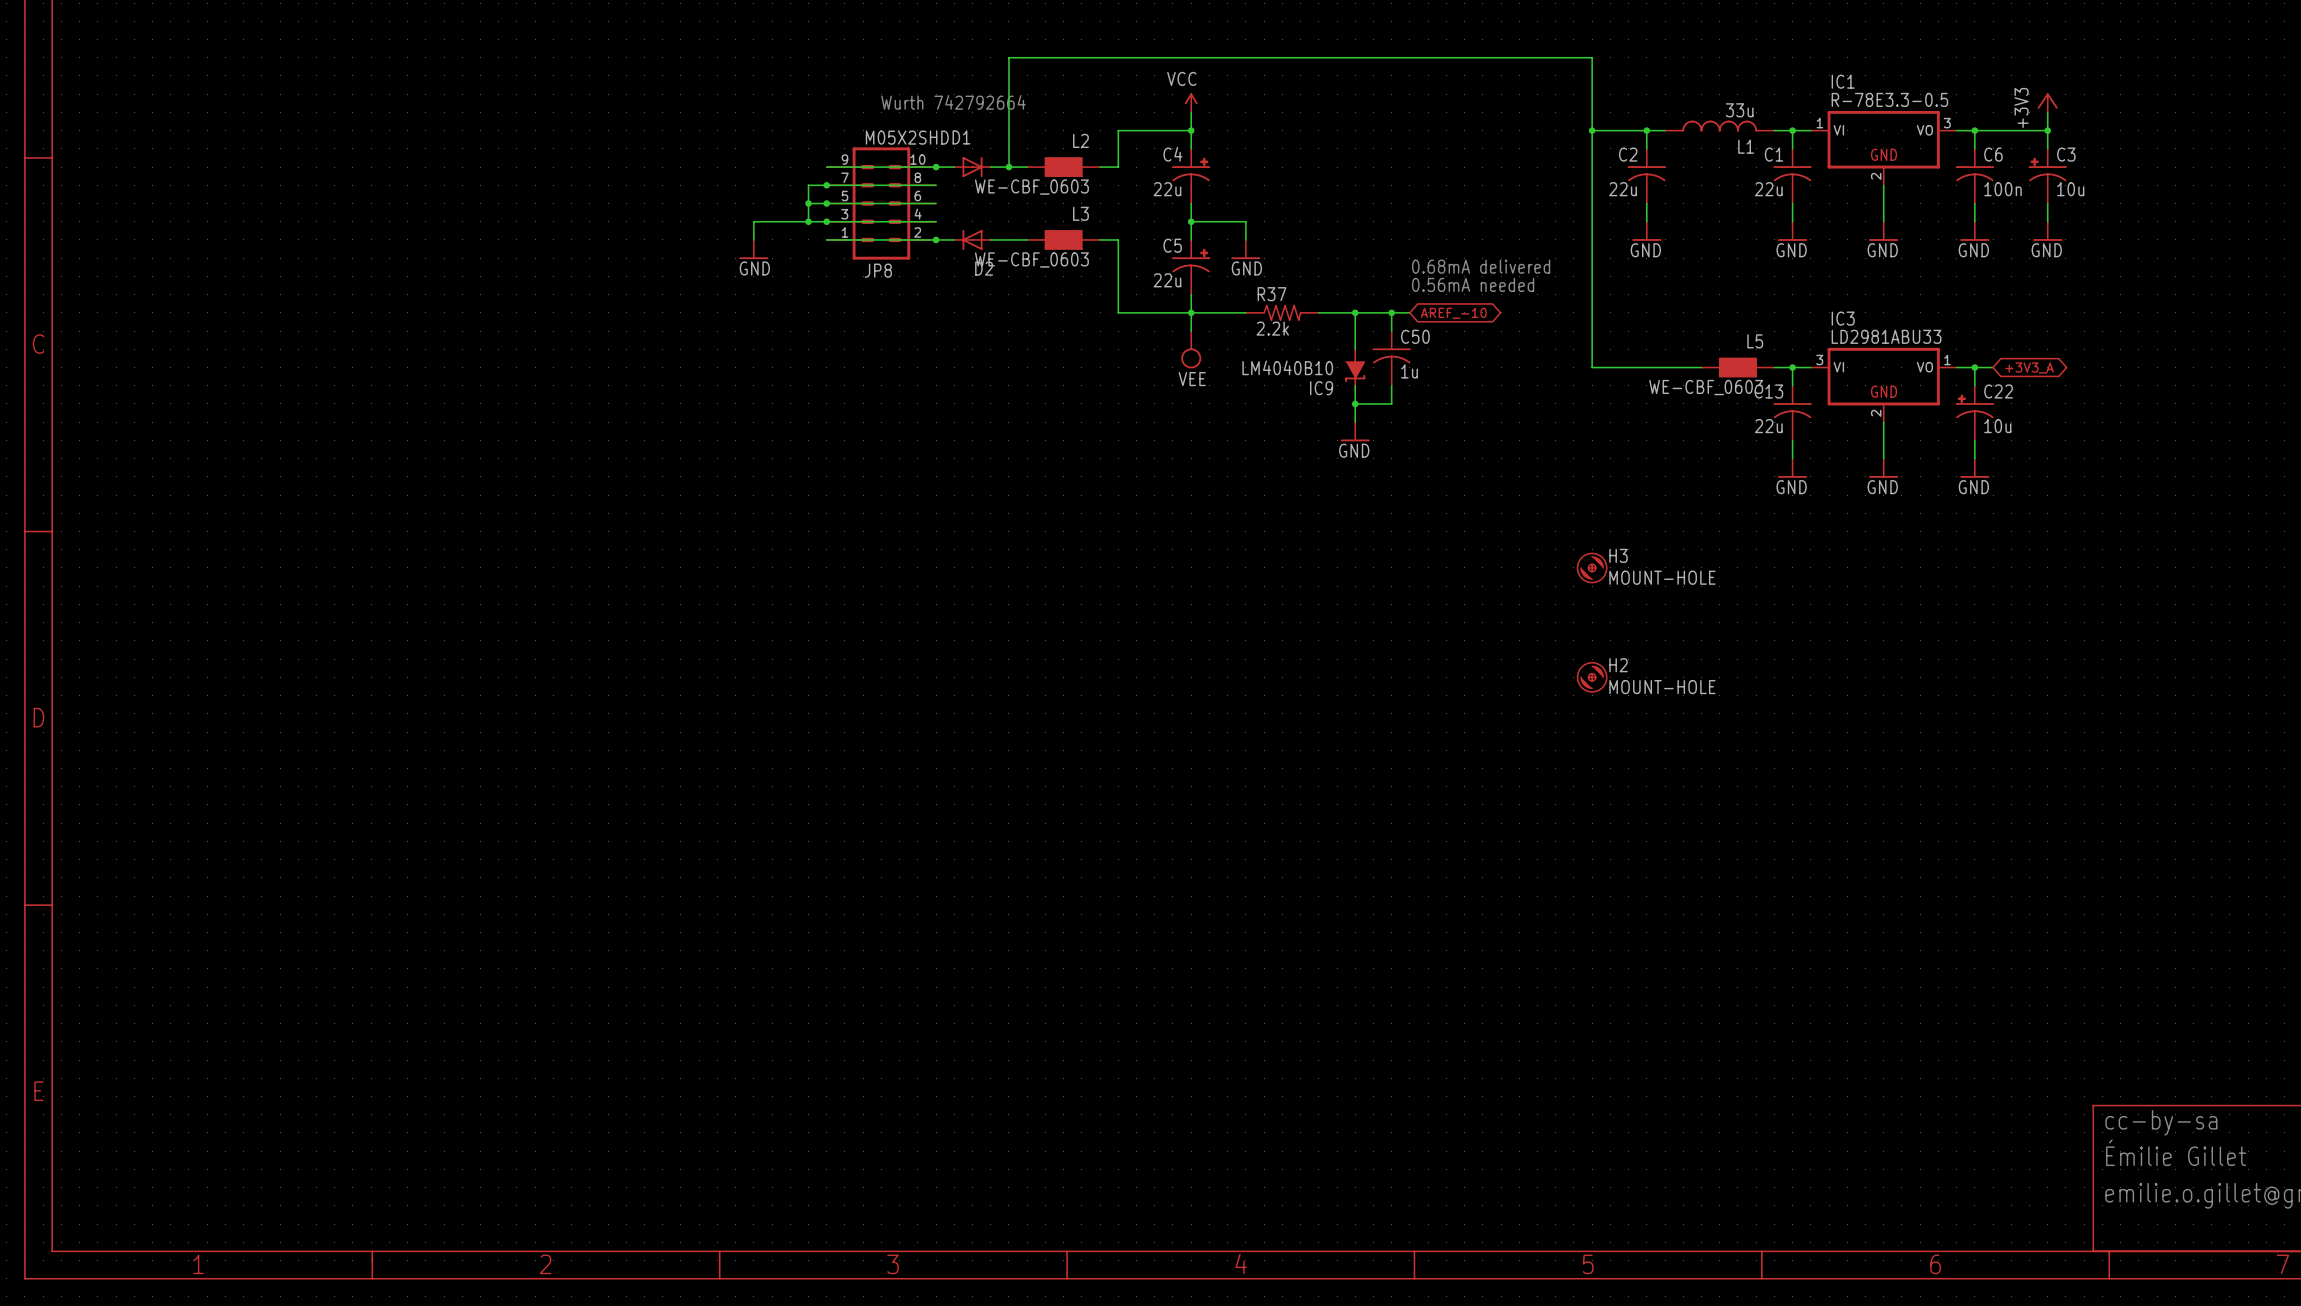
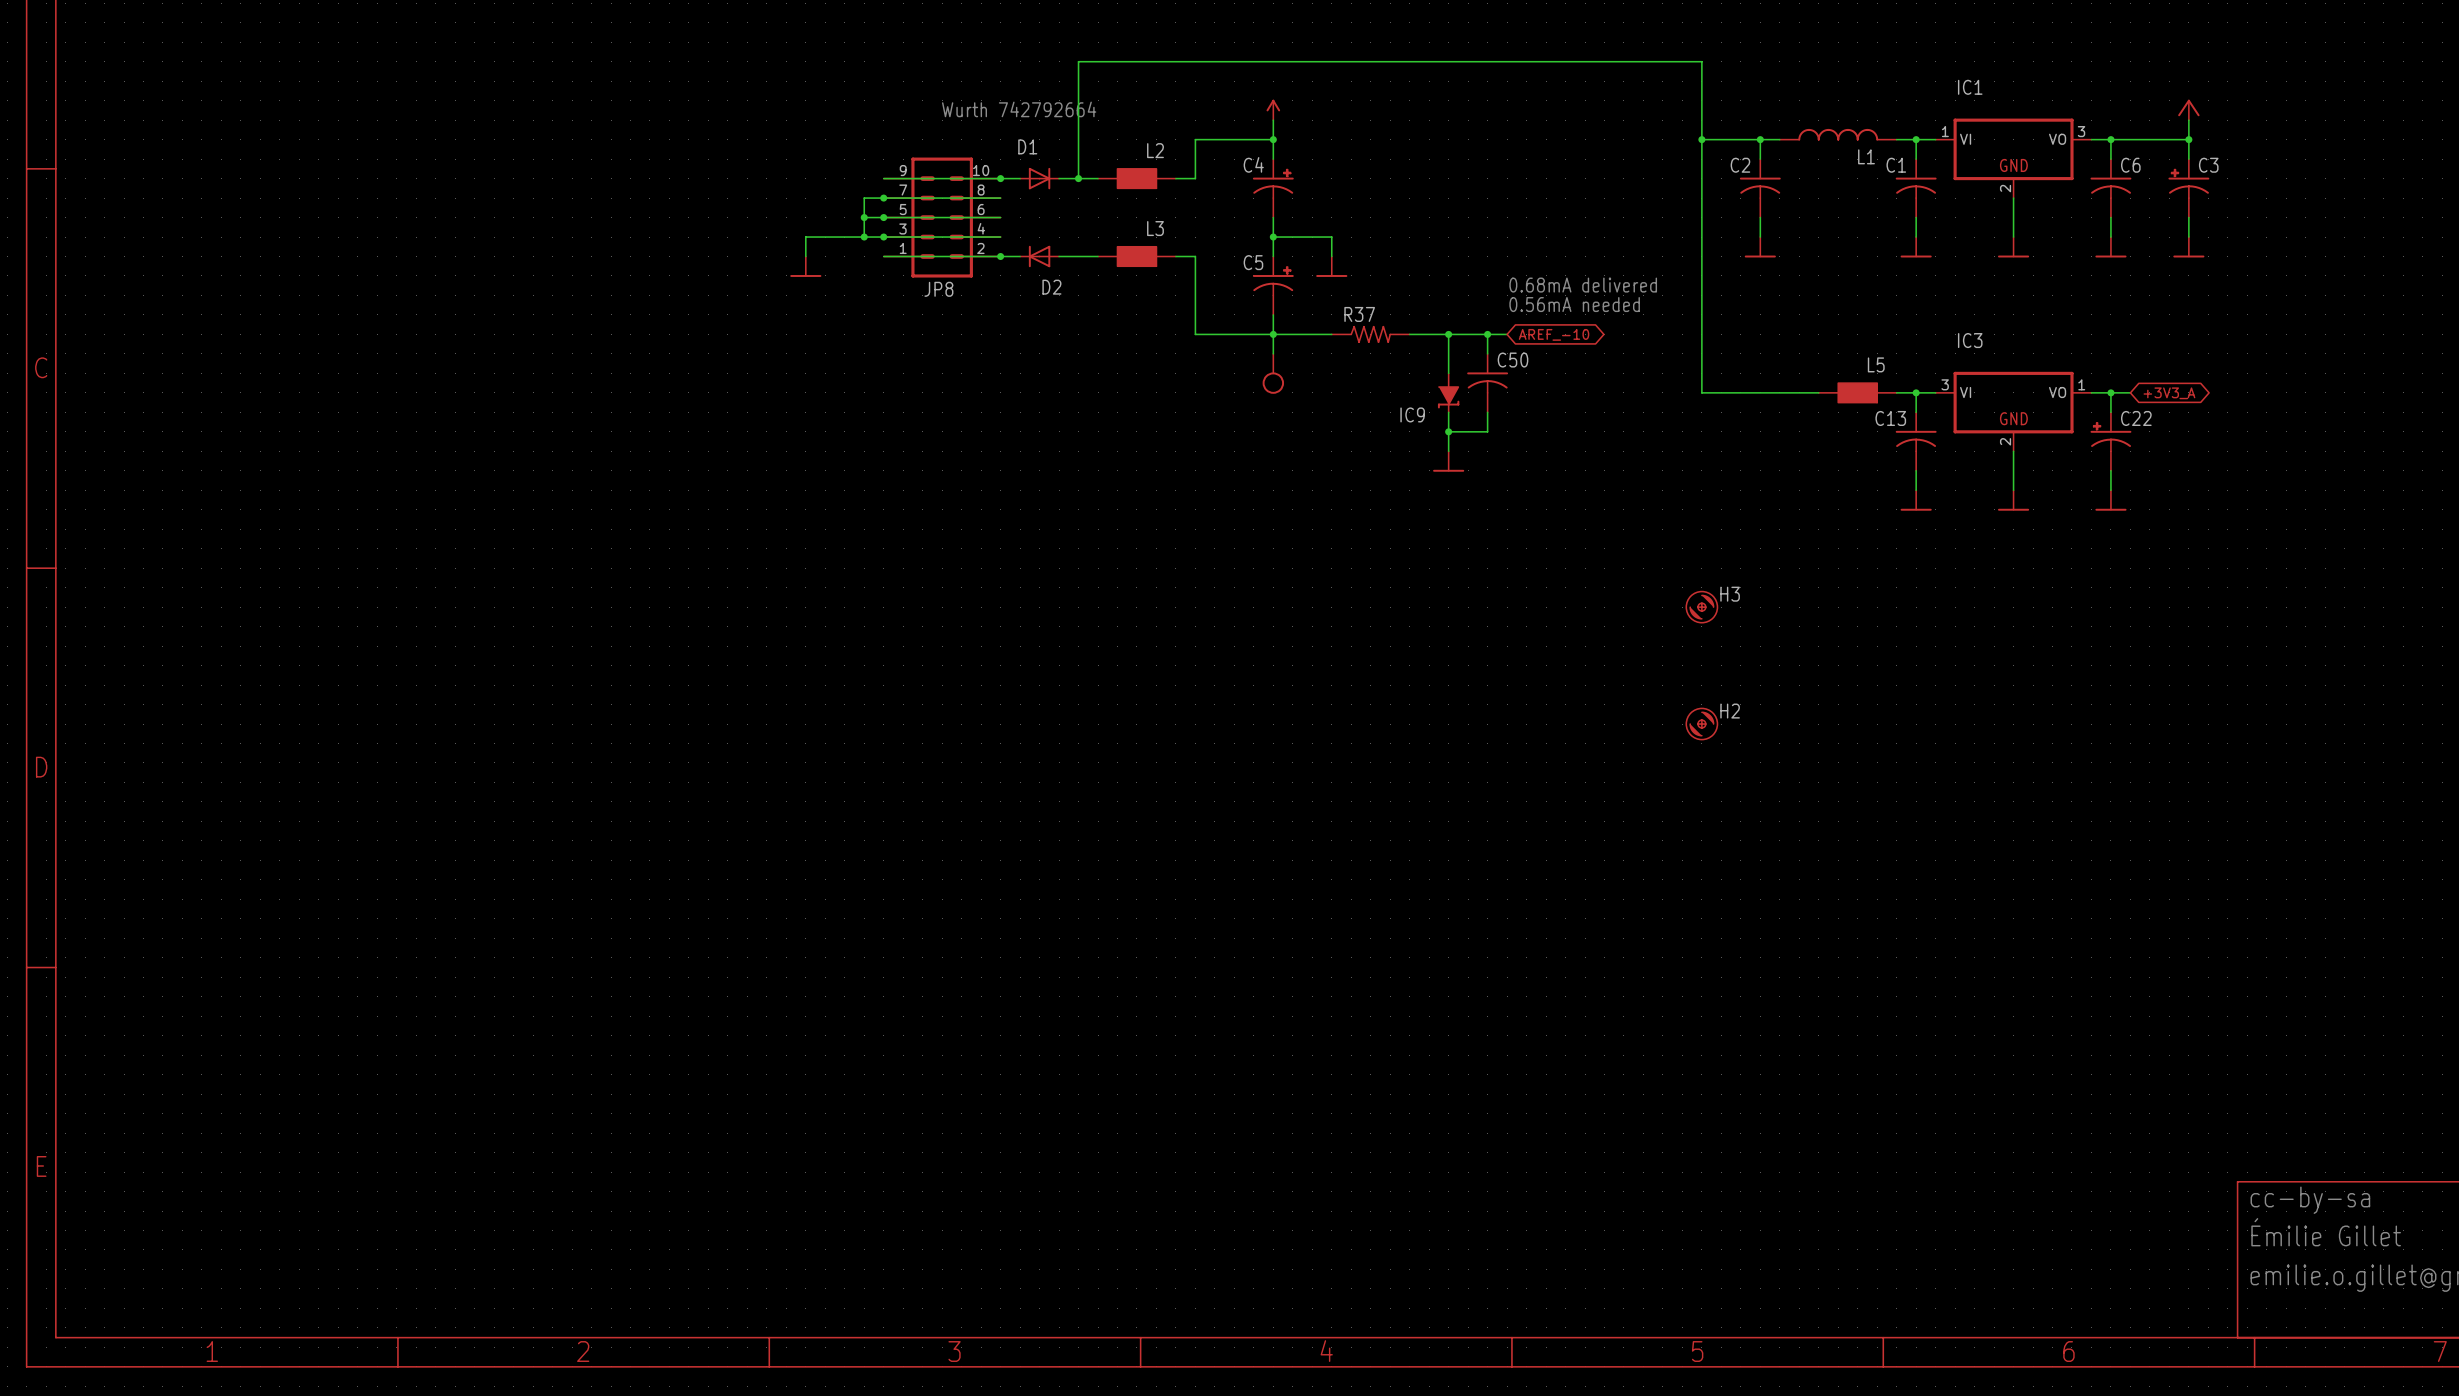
power symbol text: VCC (1181, 78) -> none
IC1 value: R-78E3.3-0.5 (1889, 99) -> none
power symbol text: +3V3 (2021, 107) -> none
L1 value: 33u (1739, 110) -> none
JP8 value: M05X2SHD (907, 137) -> none
L2 value: WE-CBF_0603 (1031, 187) -> none
C4 value: 22u (1167, 189) -> none
C2 value: 22u (1623, 189) -> none
C1 value: 22u (1768, 189) -> none
C6 value: 100n (2002, 189) -> none
C3 value: 10u (2070, 189) -> none
power symbol text: GND (1645, 250) -> none
power symbol text: GND (1791, 250) -> none
power symbol text: GND (1882, 250) -> none
power symbol text: GND (1973, 250) -> none
power symbol text: GND (2046, 250) -> none
L3 value: WE-CBF_0603 (1031, 259) -> none
power symbol text: GND (754, 268) -> none
power symbol text: GND (1246, 268) -> none
C5 value: 22u (1167, 280) -> none
R37 value: 2.2k (1272, 328) -> none
IC3 value: LD2981ABU33 (1886, 336) -> none
IC9 value: LM4040B10 (1287, 367) -> none
C50 value: 1u (1409, 371) -> none
power symbol text: VEE (1192, 379) -> none
L5 value: WE-CBF_0603 (1706, 387) -> none
C13 value: 22u (1768, 426) -> none
C22 value: 10u (1997, 426) -> none
power symbol text: GND (1354, 450) -> none
power symbol text: GND (1791, 487) -> none
power symbol text: GND (1882, 487) -> none
power symbol text: GND (1973, 487) -> none
H3 value: MOUNT-HOLE (1662, 577) -> none
H2 value: MOUNT-HOLE (1662, 687) -> none

